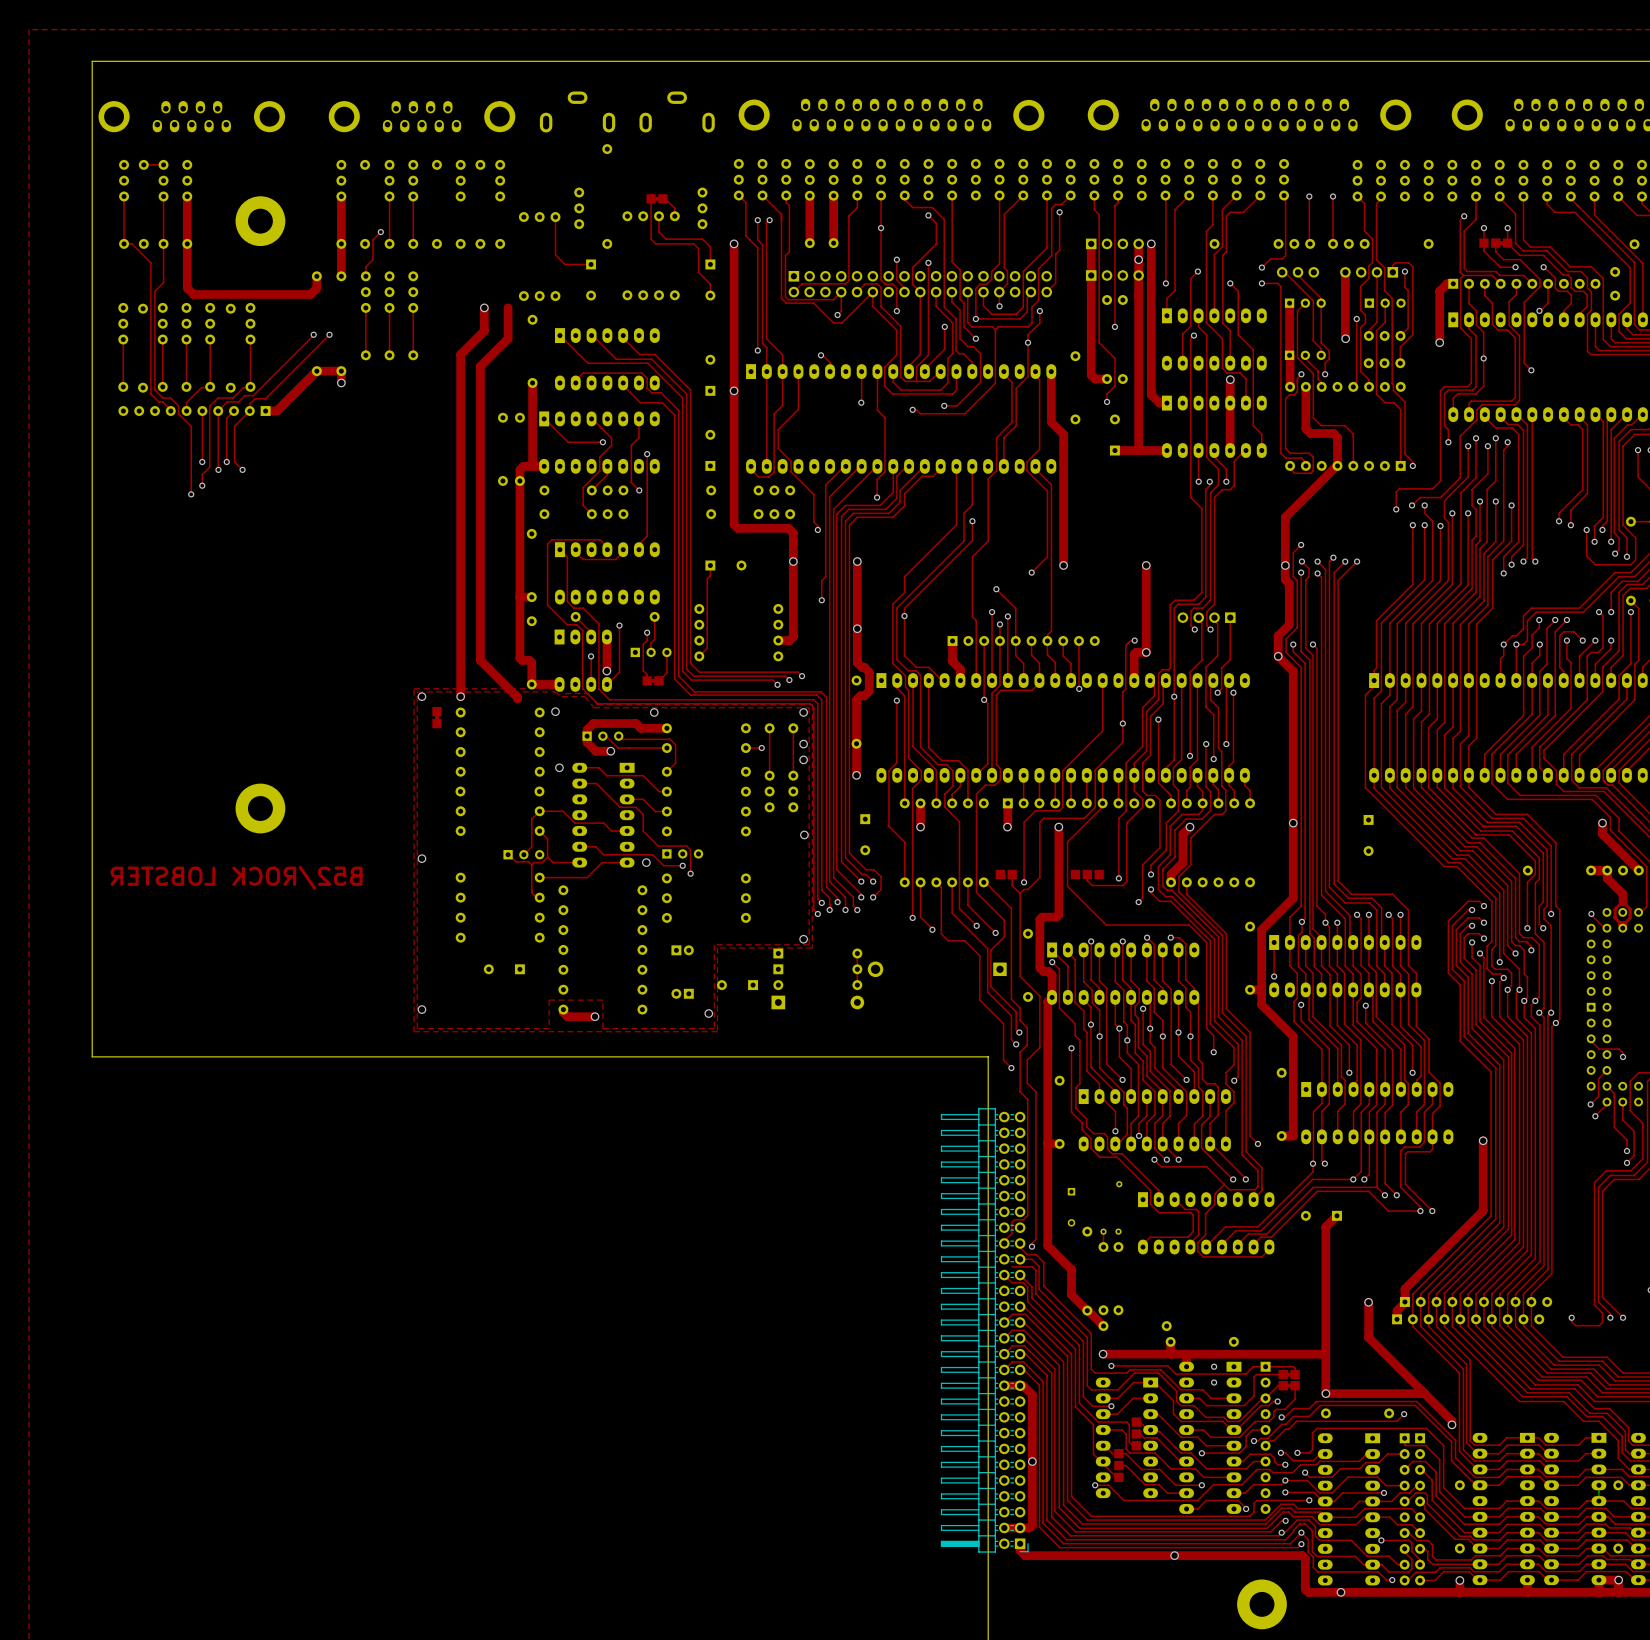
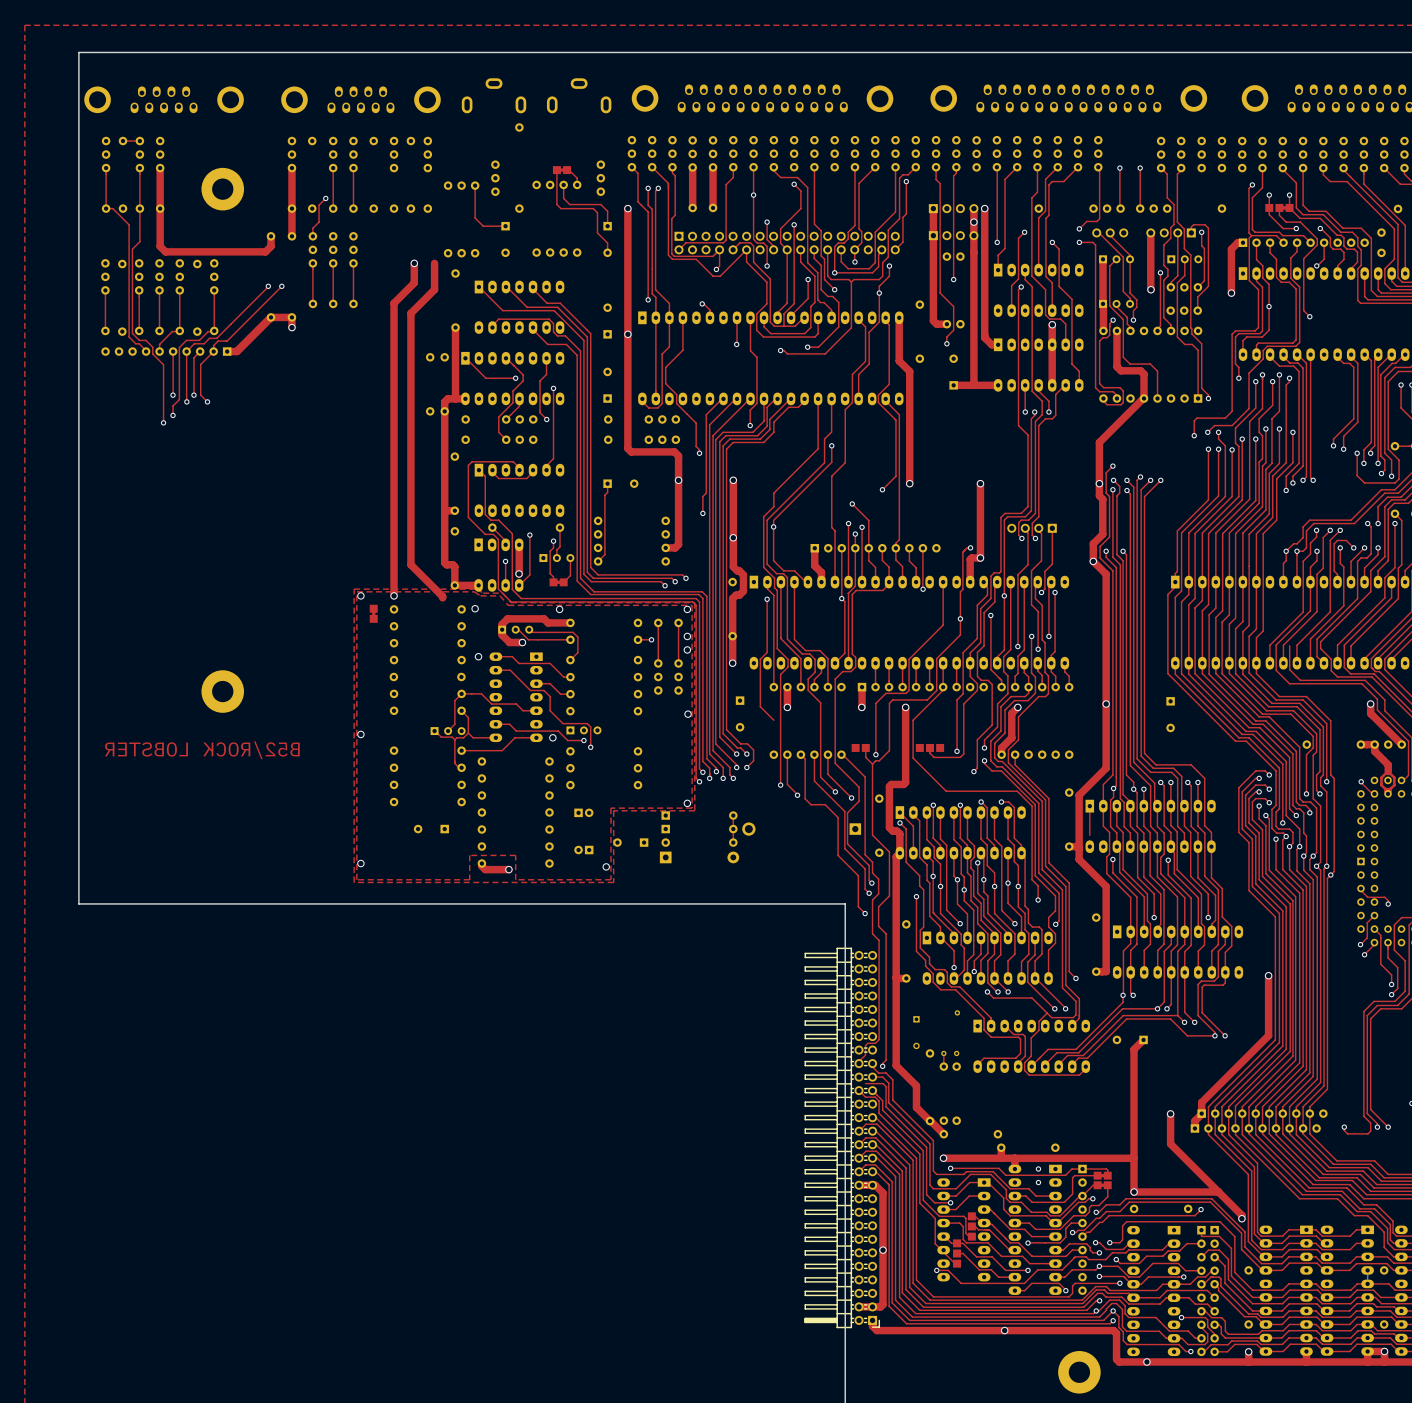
top track: (1547, 680) (1547, 714) (1507, 754) -> none
top track: (904, 842) (904, 882) -> none
via: (1274, 976) -> none

